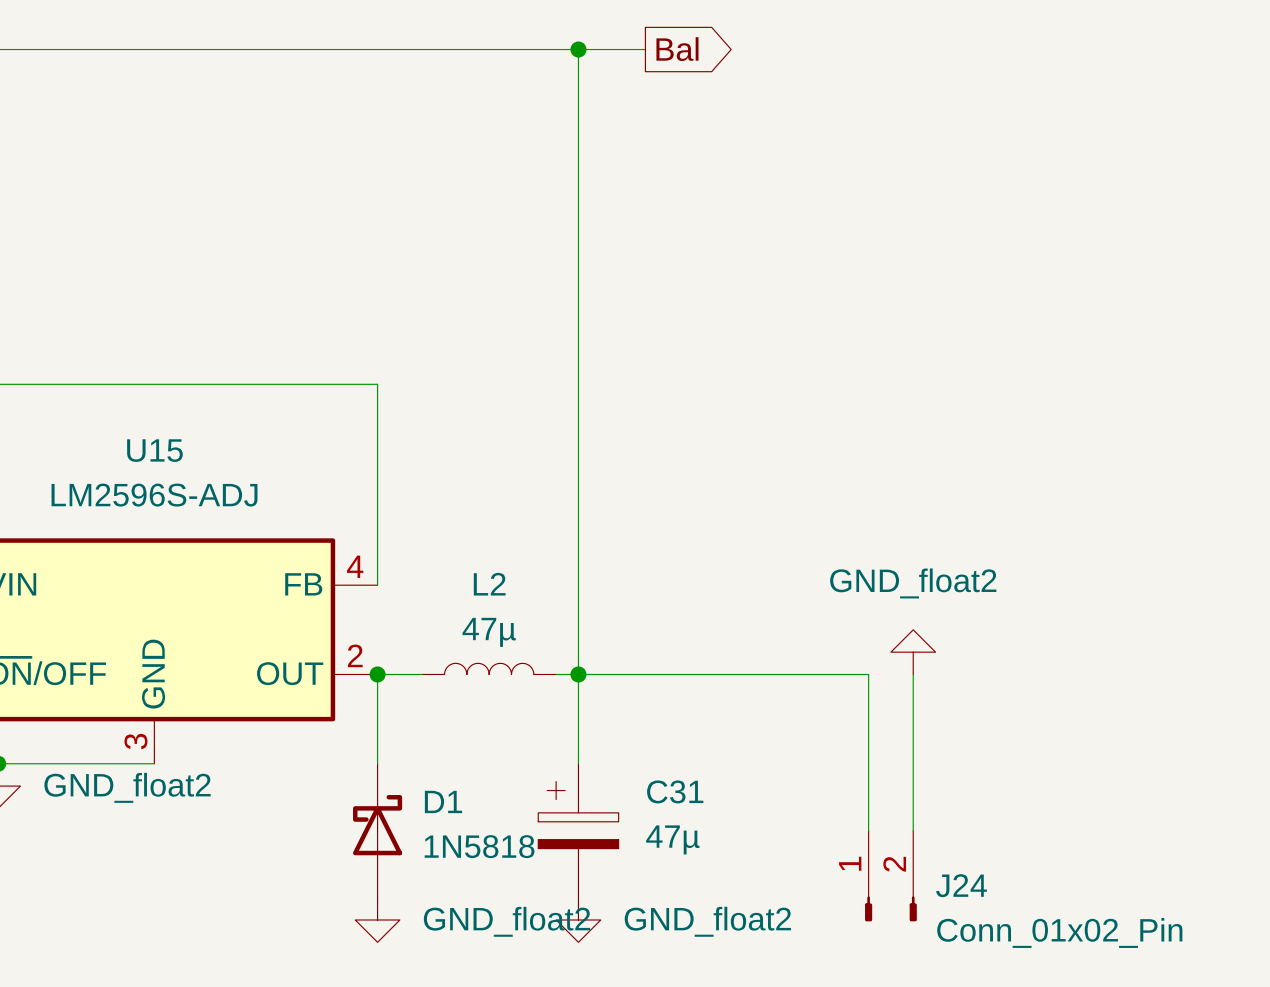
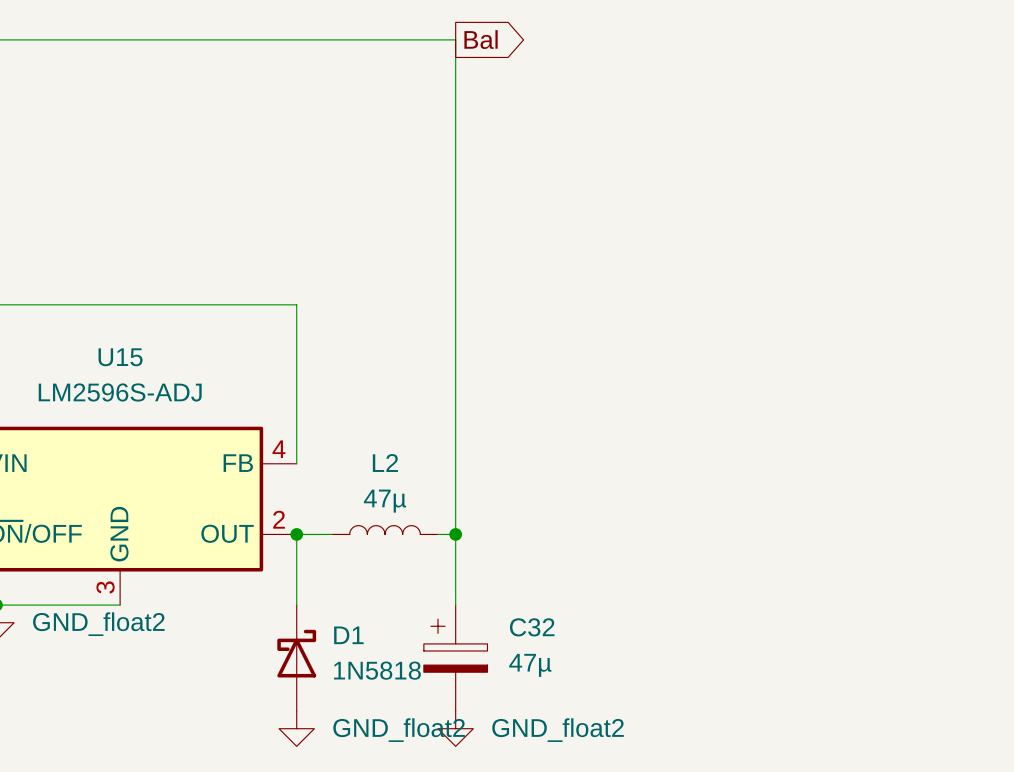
wire: (578, 49) (645, 49) -> none
junction: (578, 49) -> none
global label position: Bal (677, 49) -> Bal (481, 39)
power symbol: GND_float2 (913, 652) -> none
wire: (578, 674) (868, 674) (868, 830) -> none
wire: (913, 674) (913, 830) -> none
C31 name: C31 (675, 791) -> C32 (532, 627)
J24: Conn_01x02_Pin (890, 876) -> none

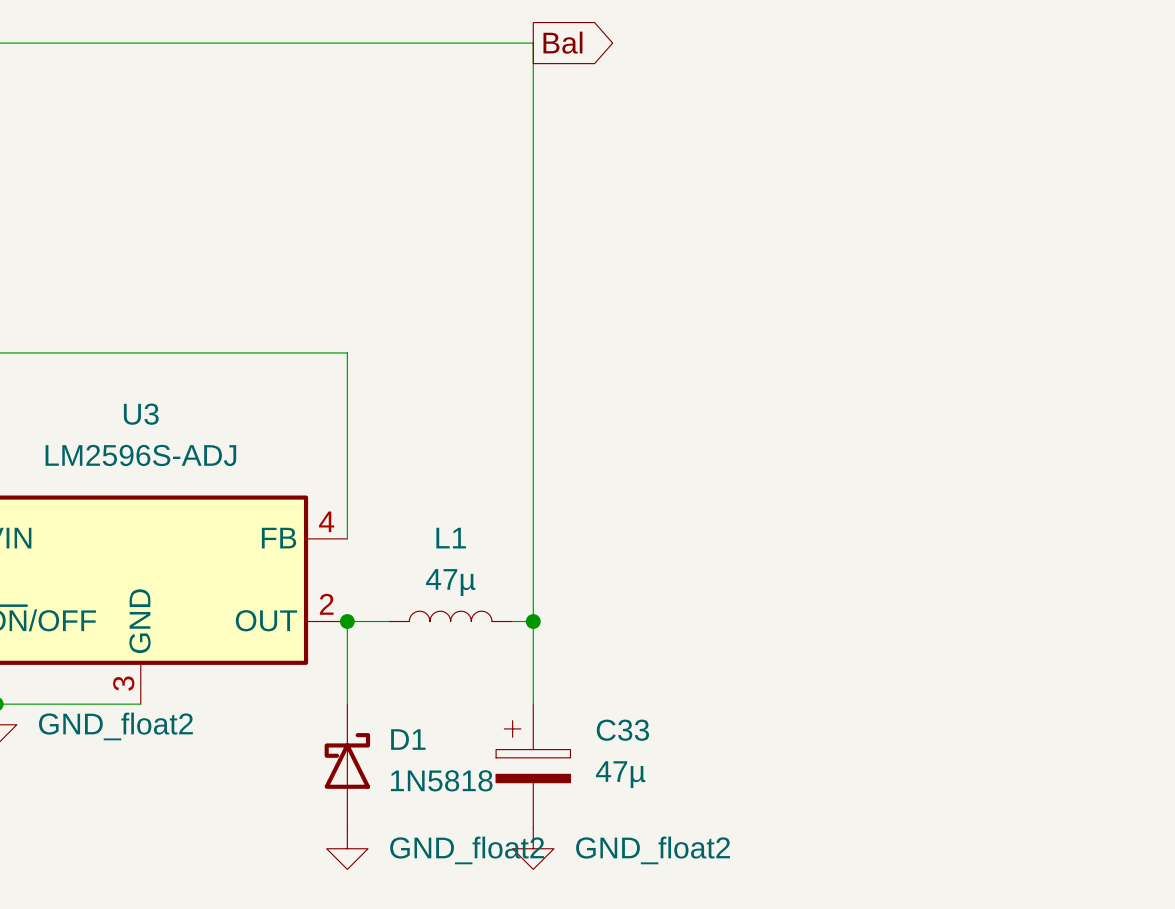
U15 name: U15 (120, 357) -> U3 (141, 414)
L2 name: L2 (385, 462) -> L1 (451, 538)
C32 name: C32 (532, 627) -> C33 (622, 730)

